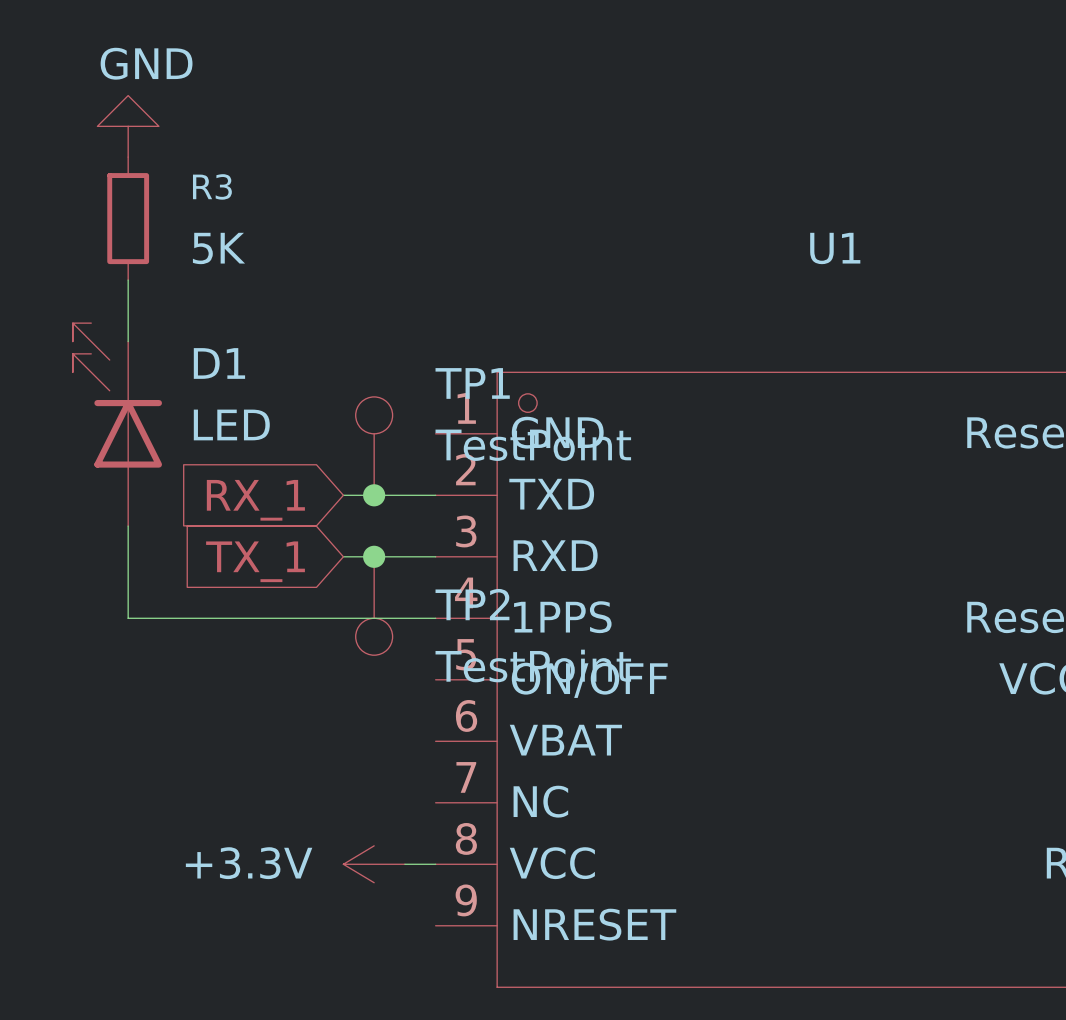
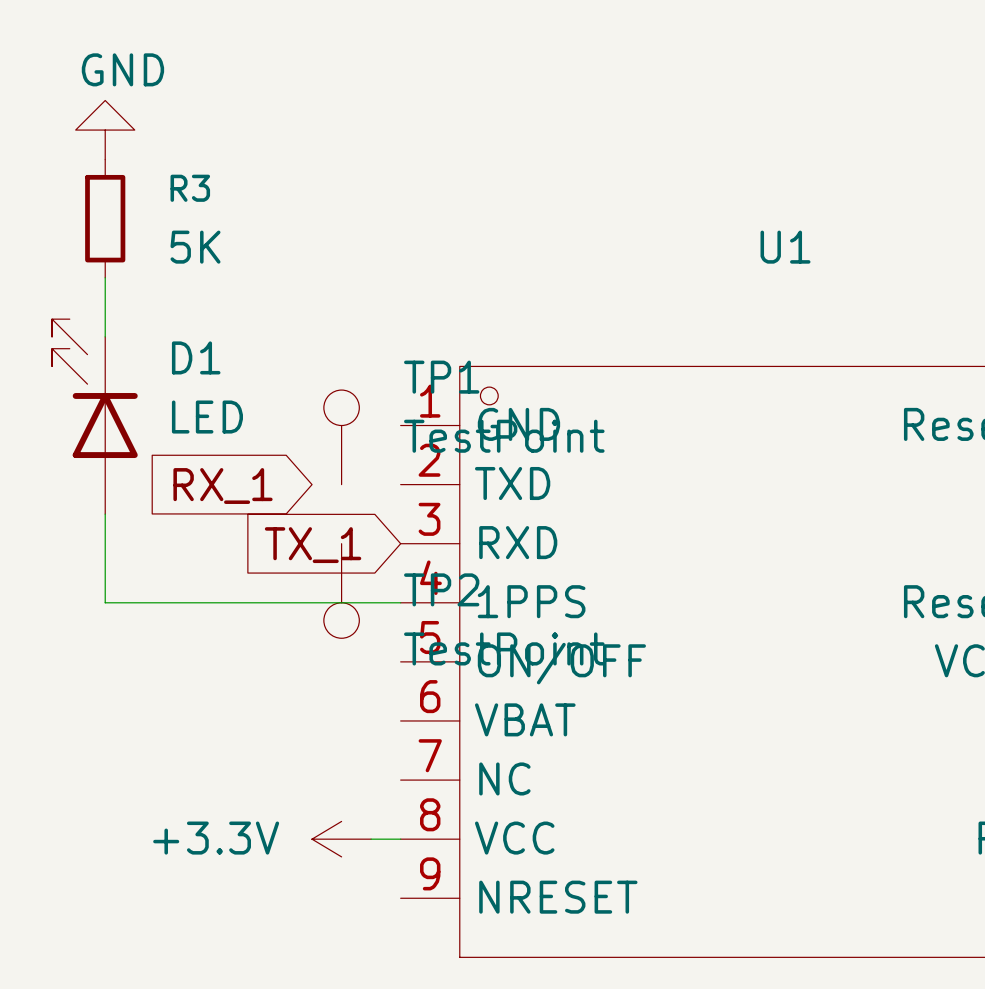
wire: (343, 495) (435, 495) -> none
junction: (374, 495) -> none
wire: (343, 556) (435, 556) -> none
junction: (374, 556) -> none
global label position: TX_1 (255, 561) -> TX_1 (313, 545)

